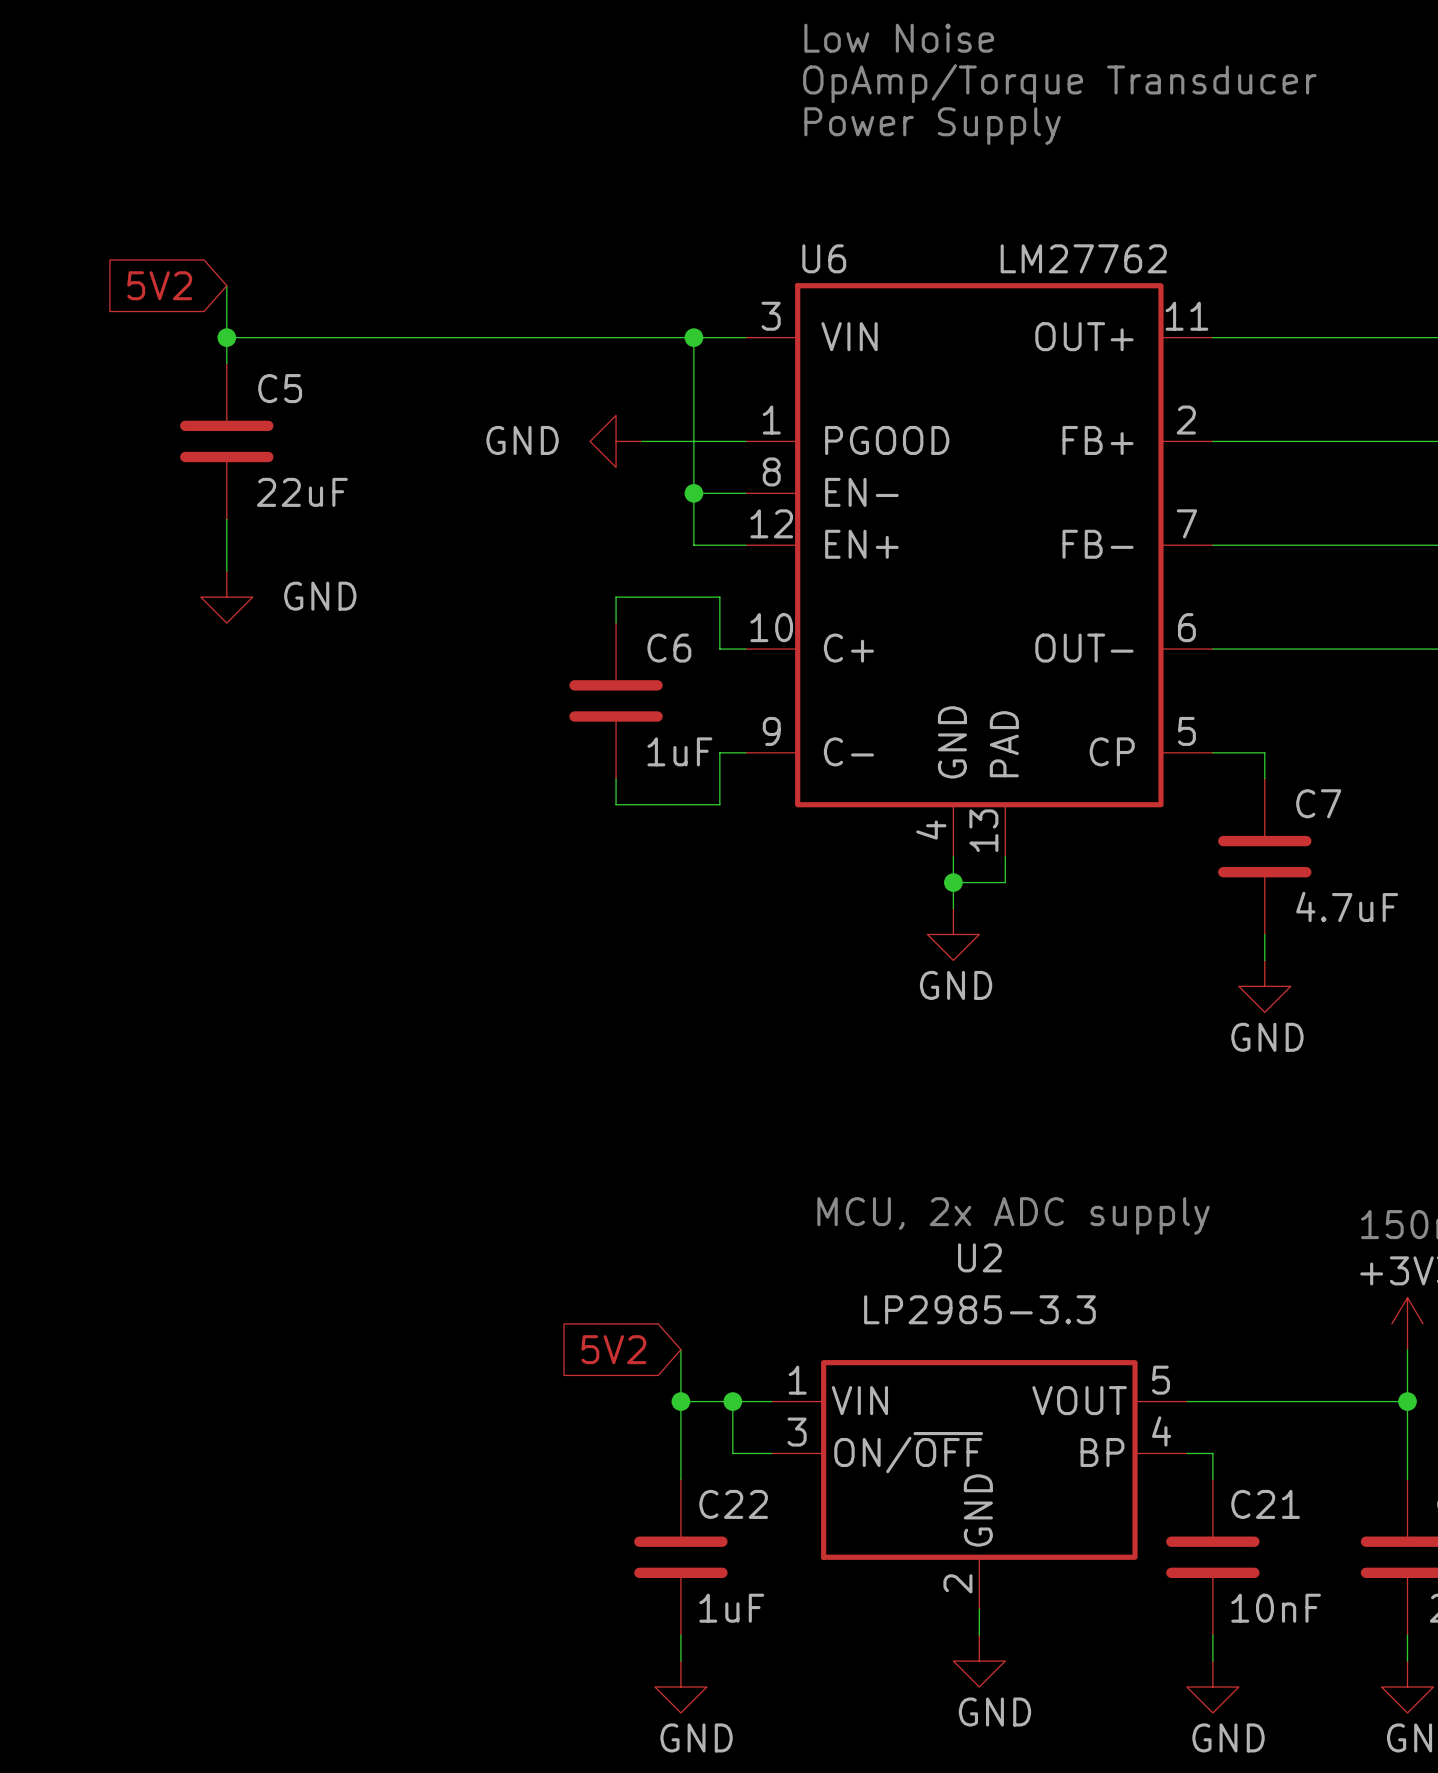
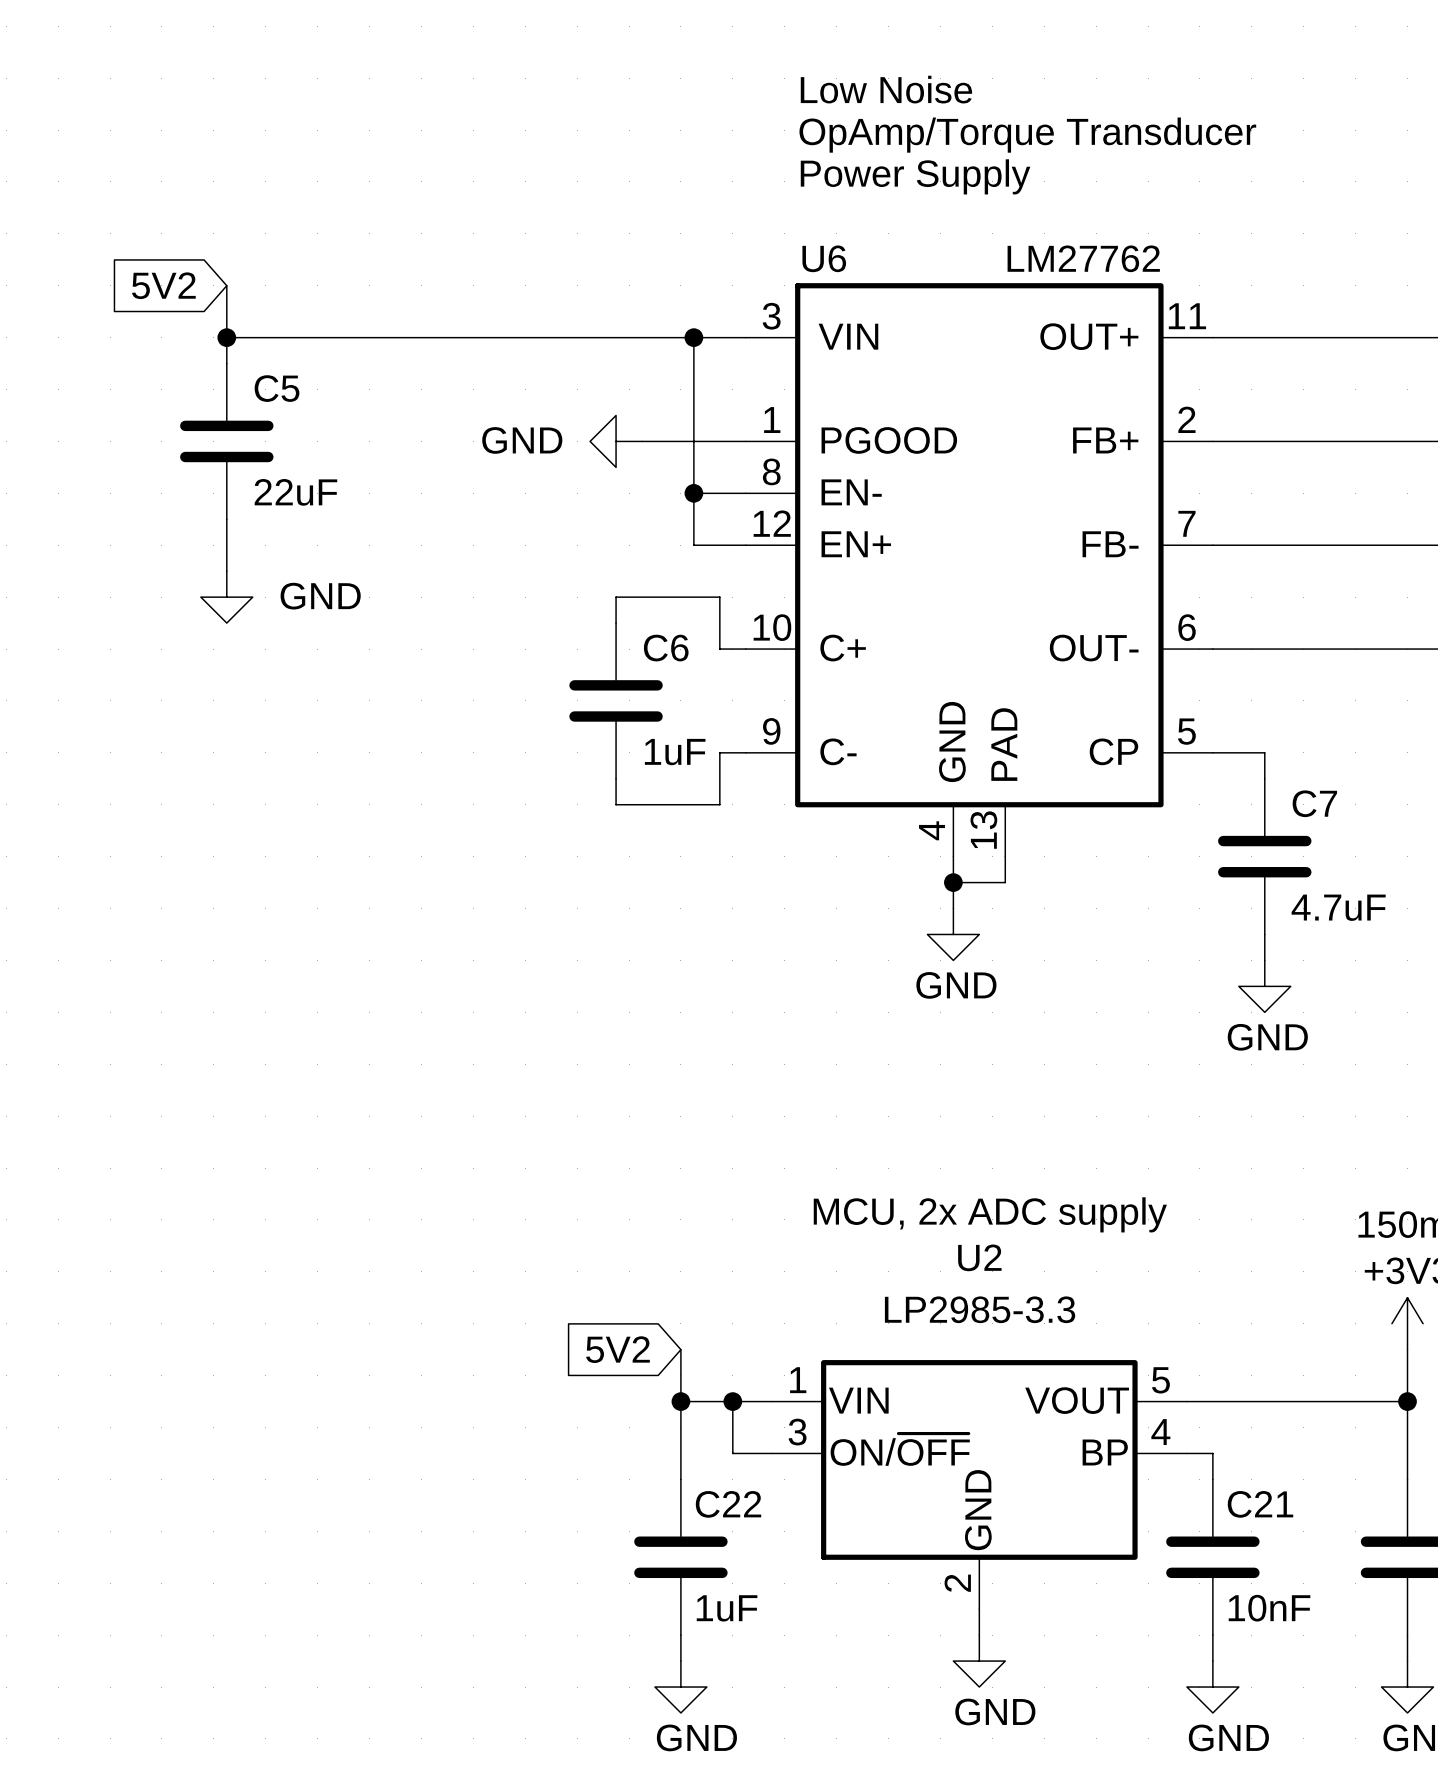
text position: Low Noise (899, 38) -> Low Noise (886, 89)
text position: OpAmp/Torque Transducer (1059, 83) -> OpAmp/Torque Transducer (1027, 135)
text position: Power Supply (932, 126) -> Power Supply (915, 176)

